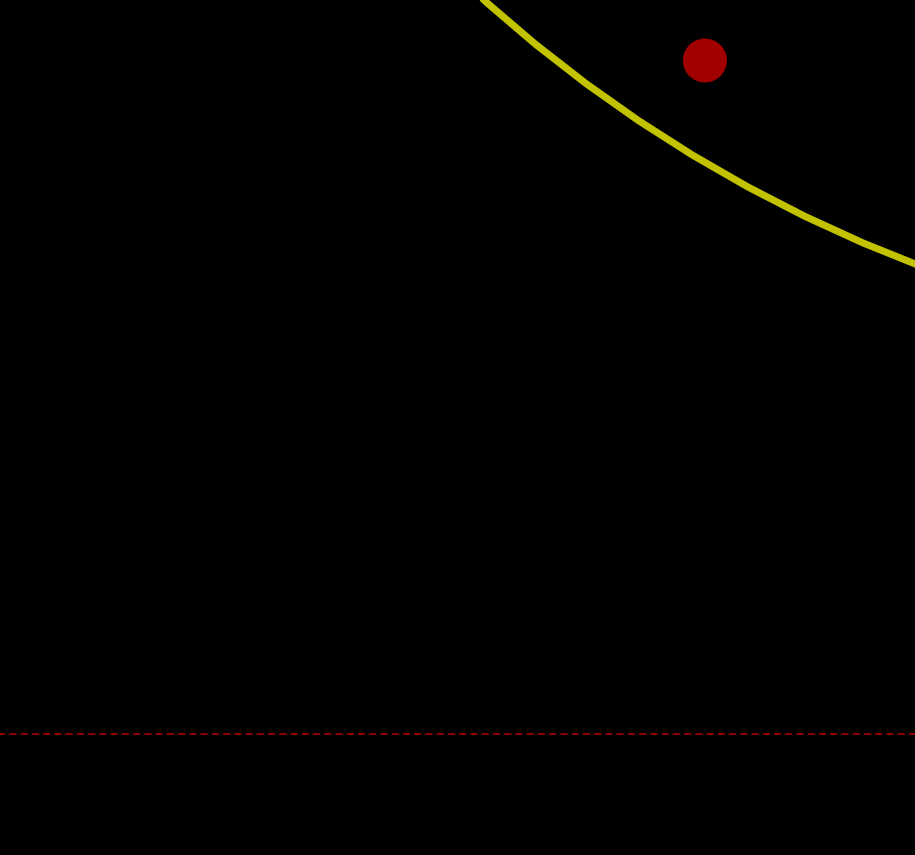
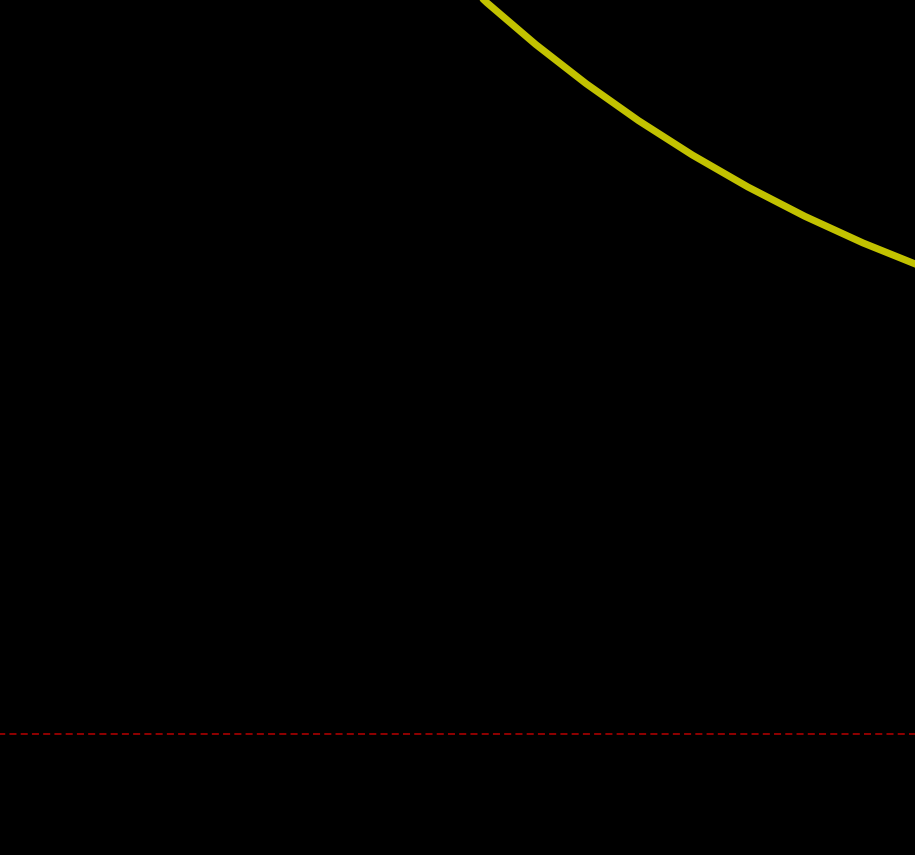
part: (704, 60) -> none

